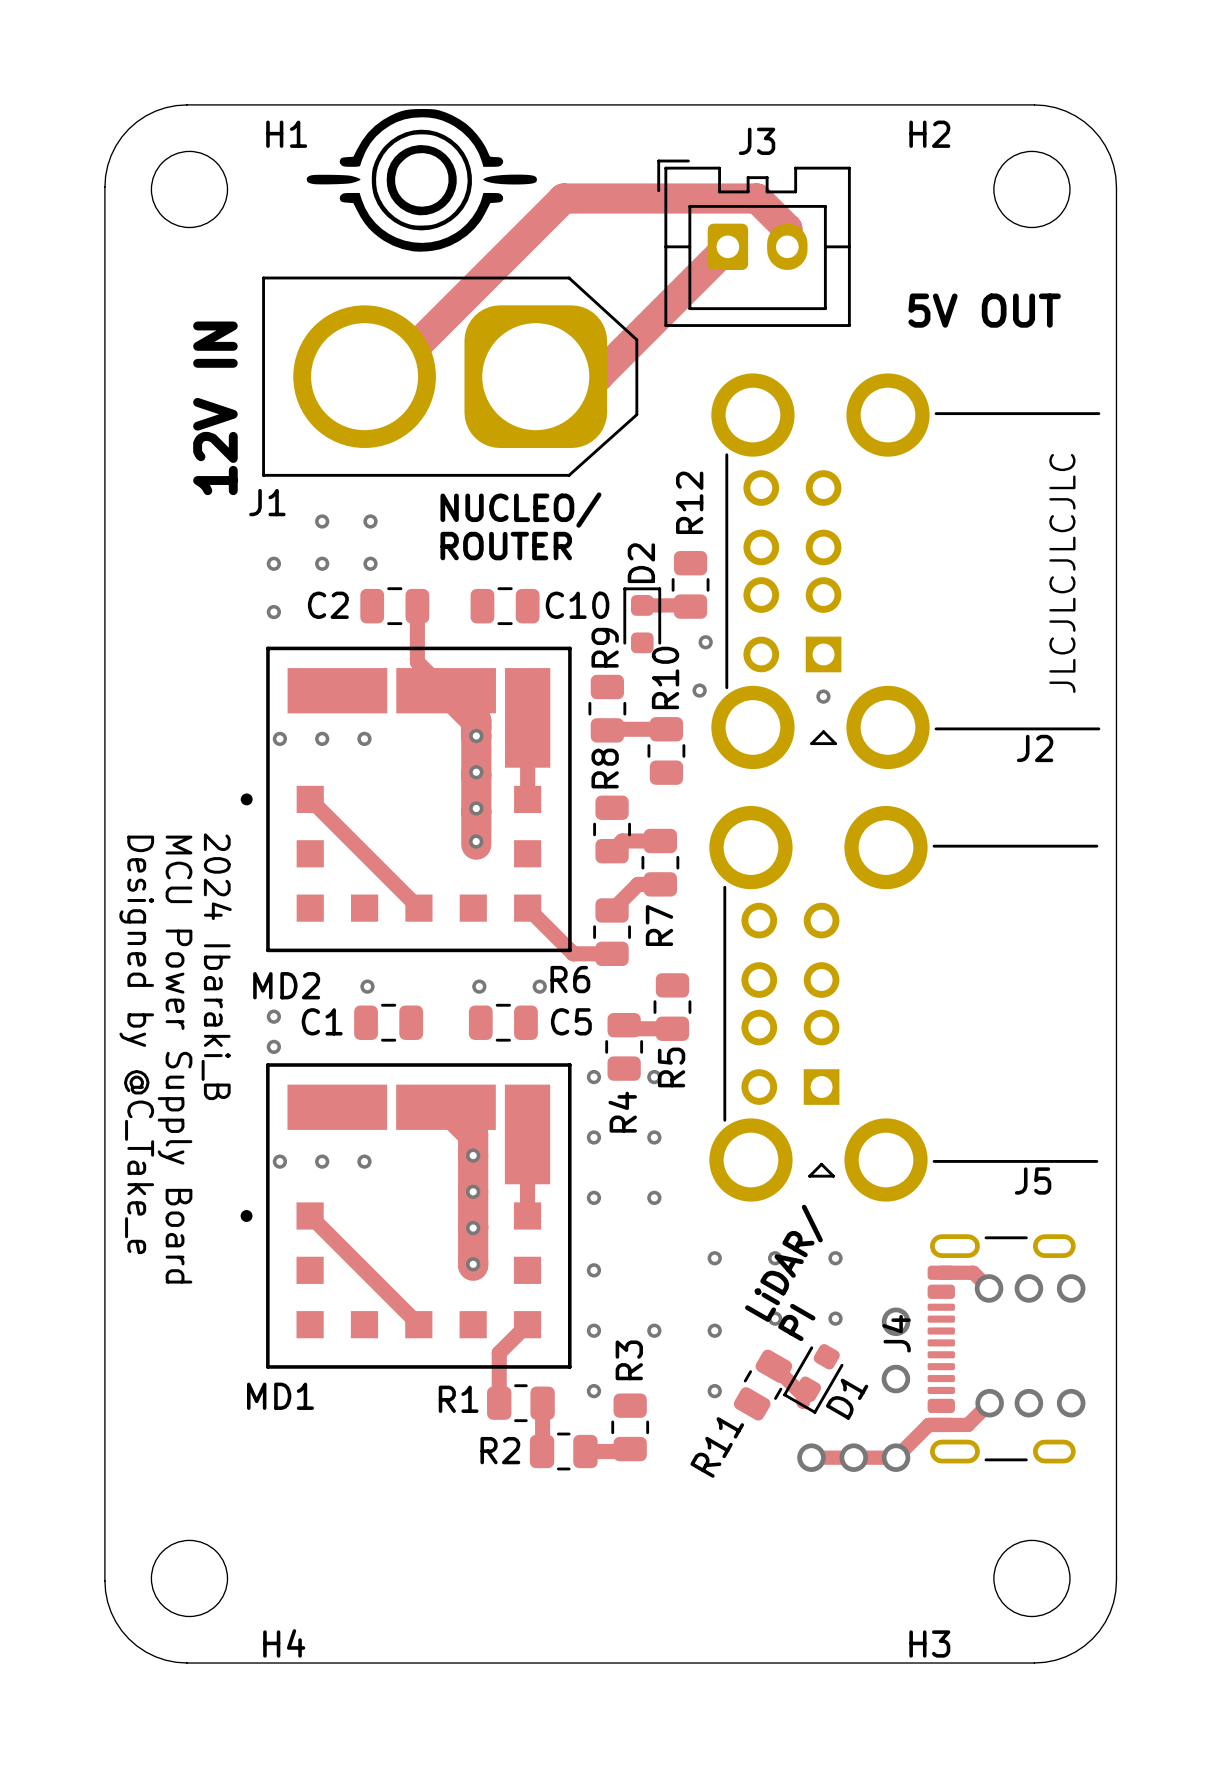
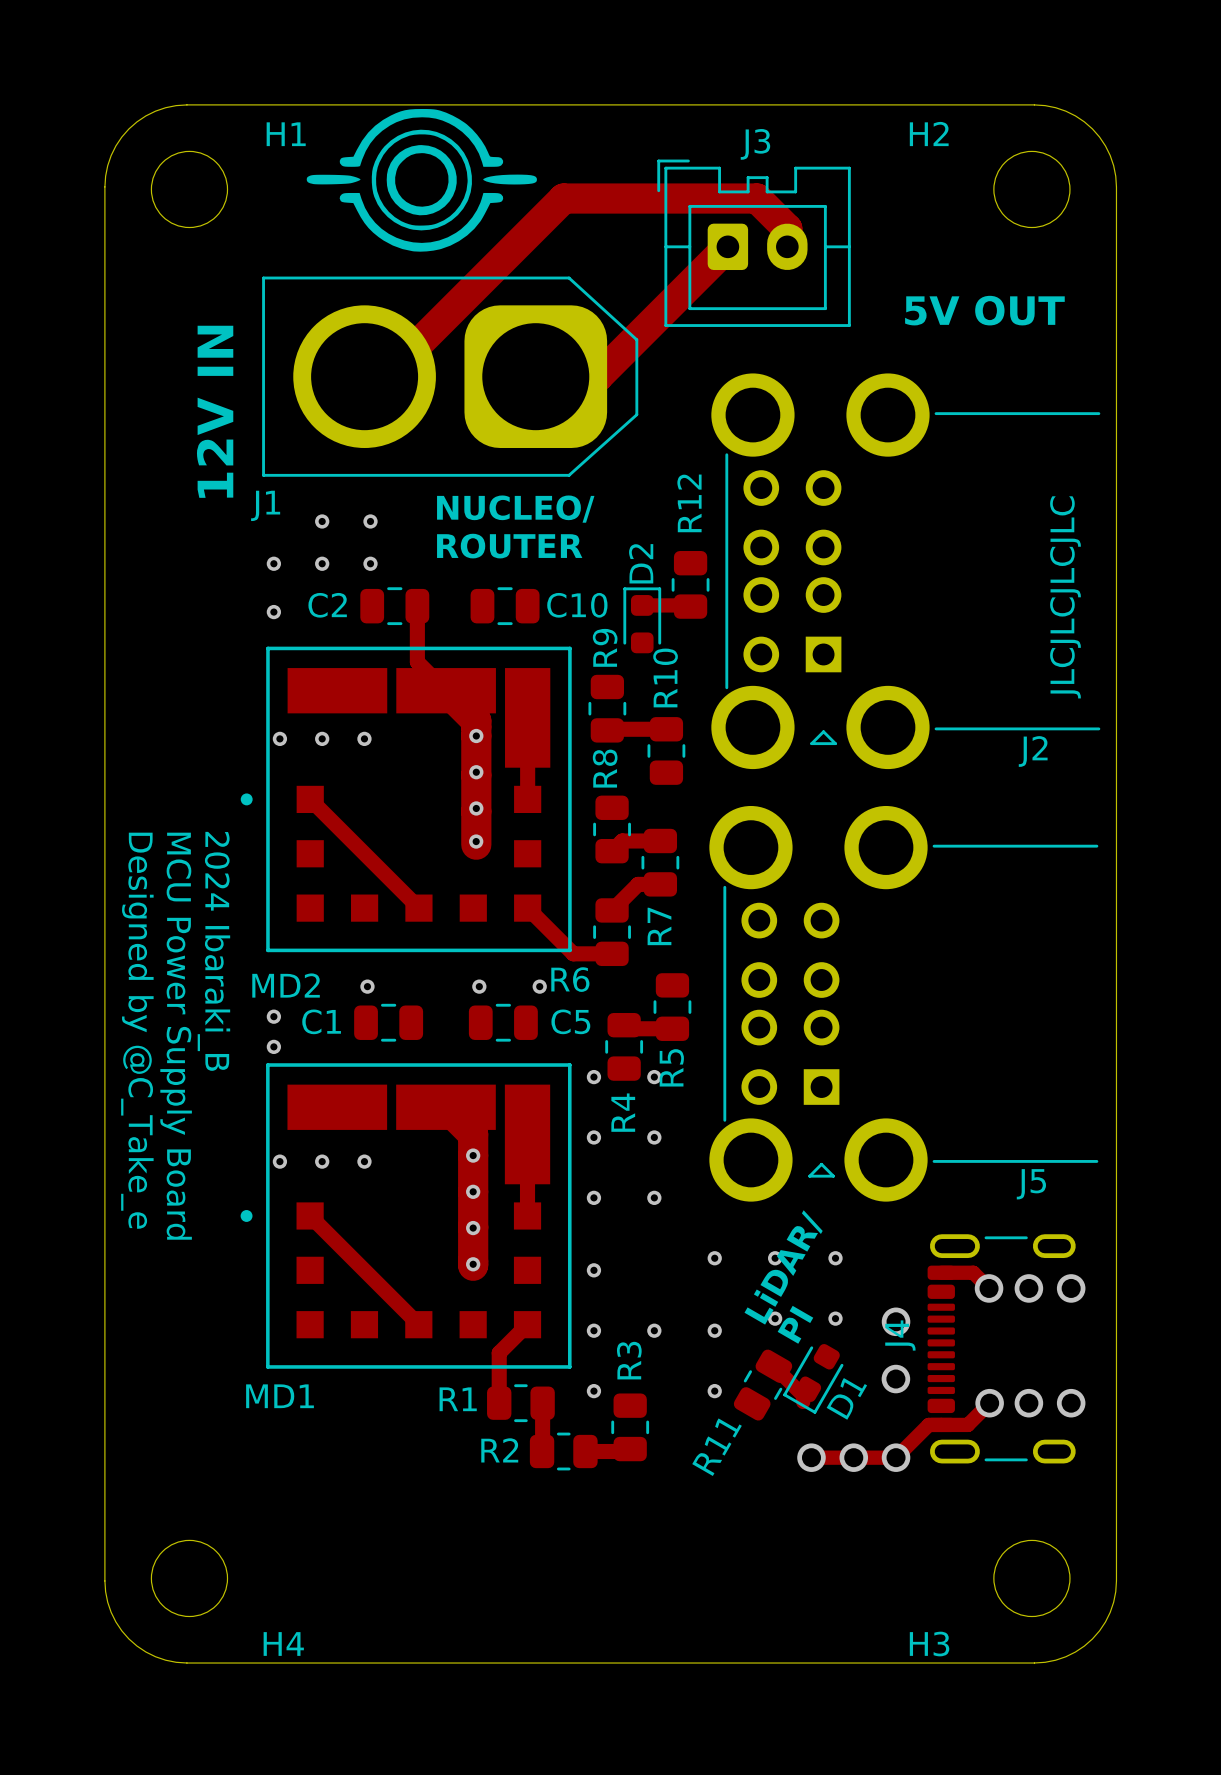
via: (705, 642) -> none
via: (699, 690) -> none
via: (823, 696) -> none

